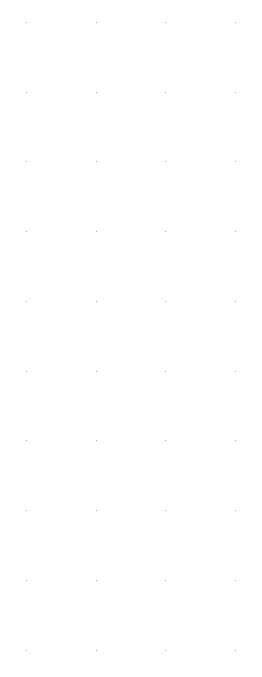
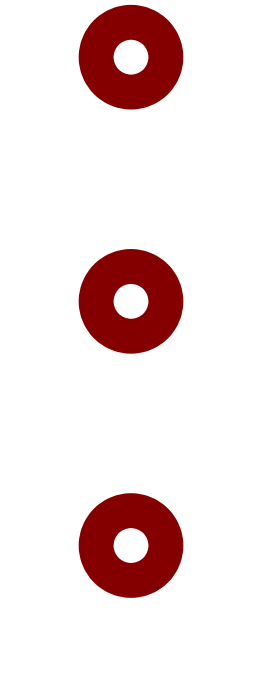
part: none -> (131, 57)
part: none -> (131, 301)
part: none -> (131, 545)

